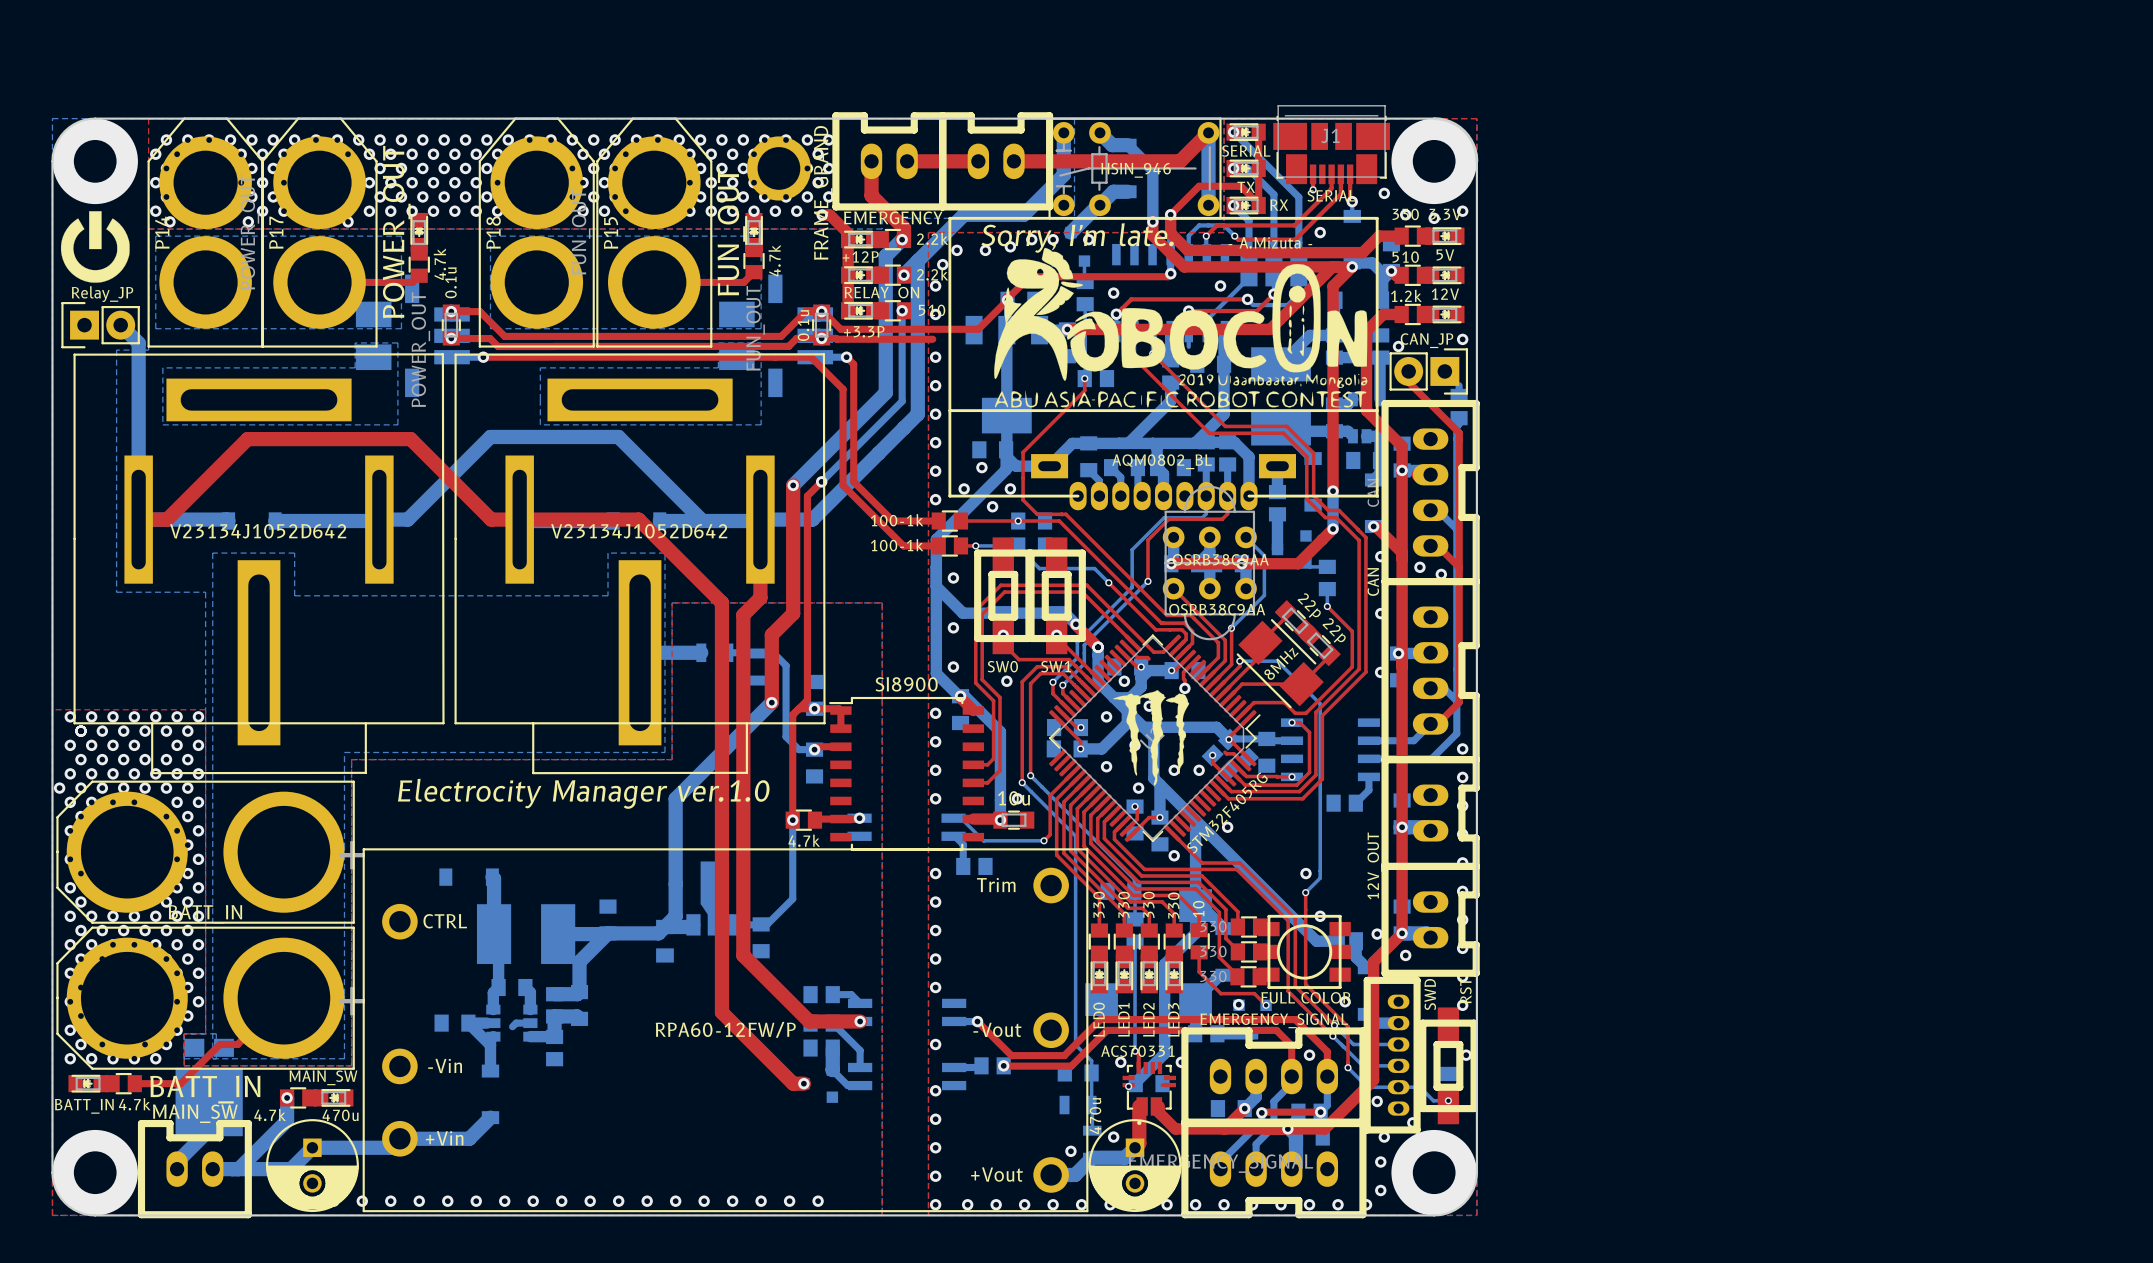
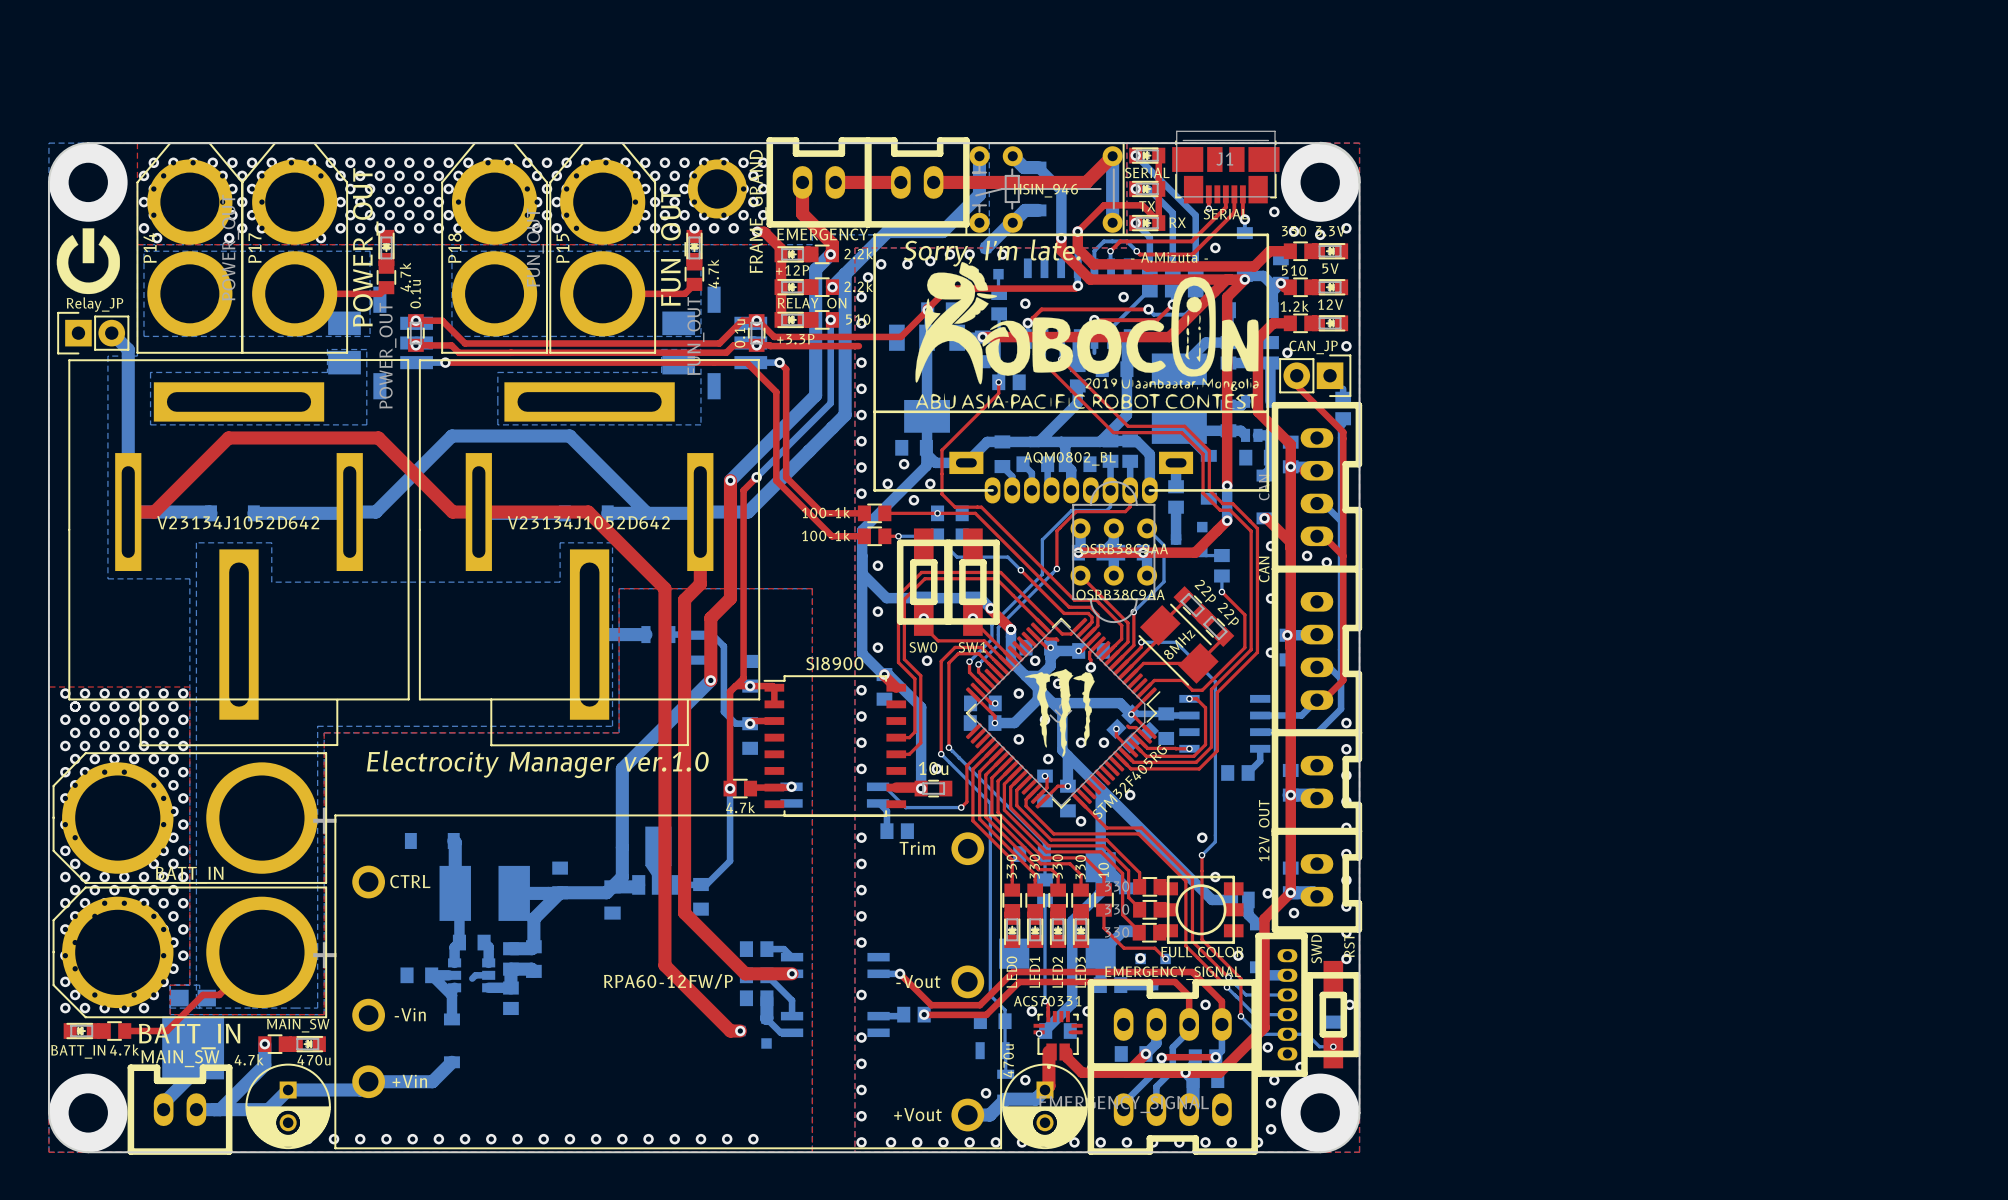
via: none -> (143, 720)
via: (59, 788) -> none

